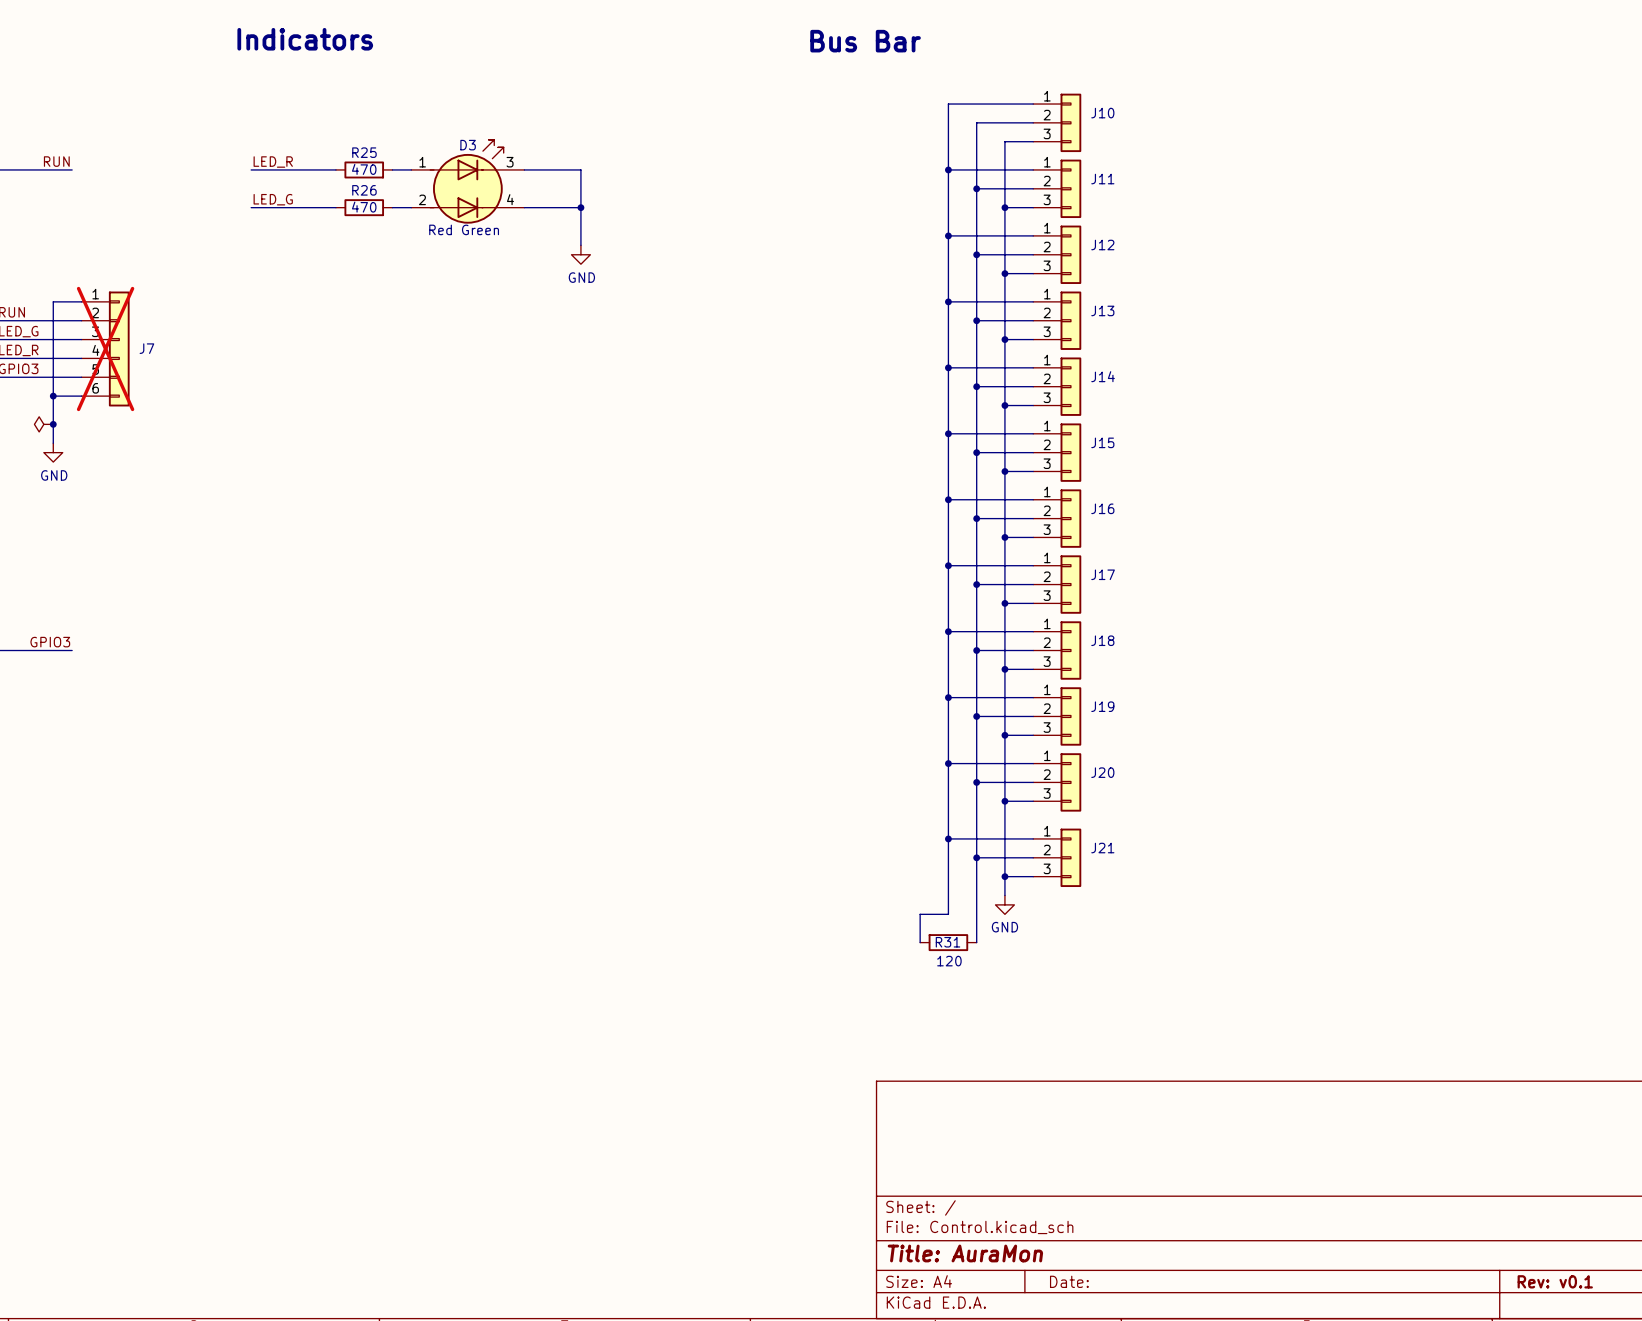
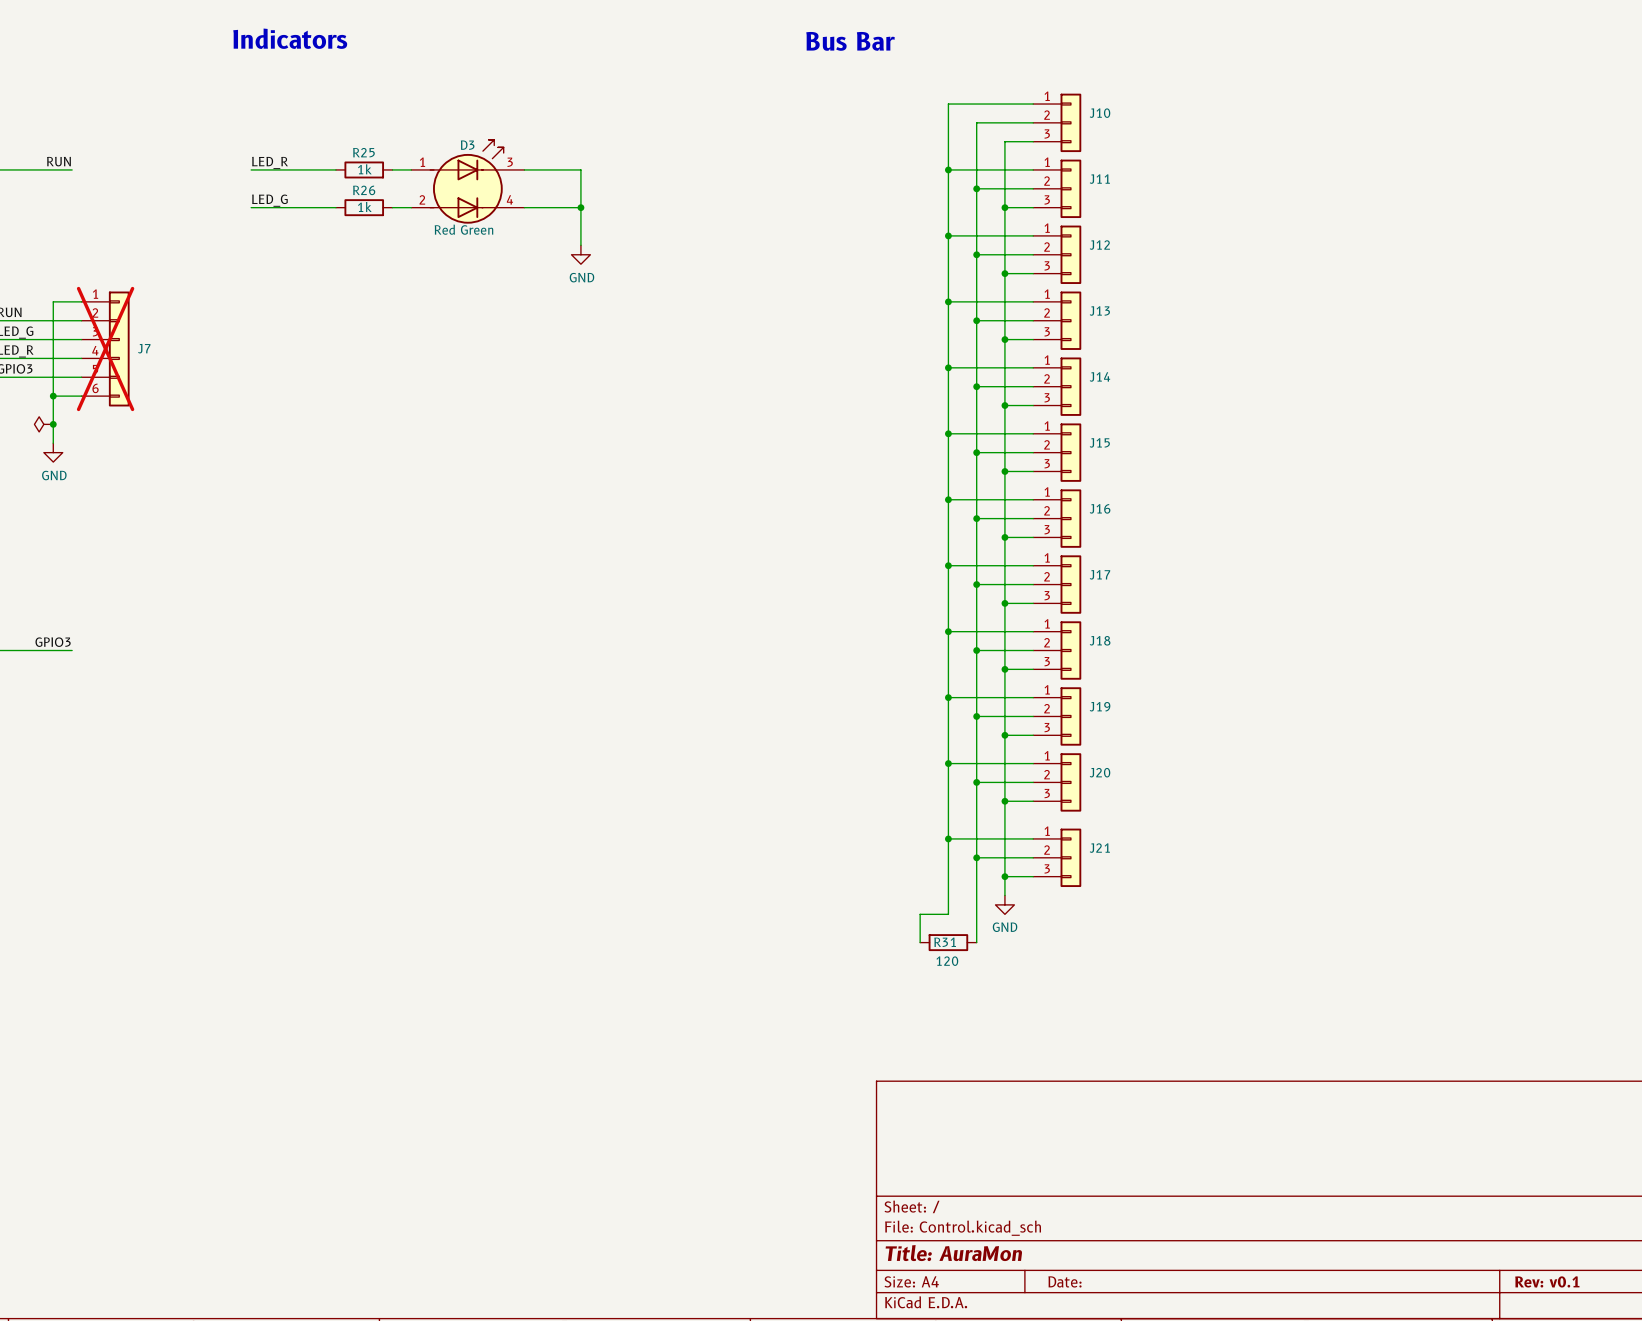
R25 value: 470 (364, 169) -> 1k (364, 169)
R26 value: 470 (364, 207) -> 1k (364, 207)

